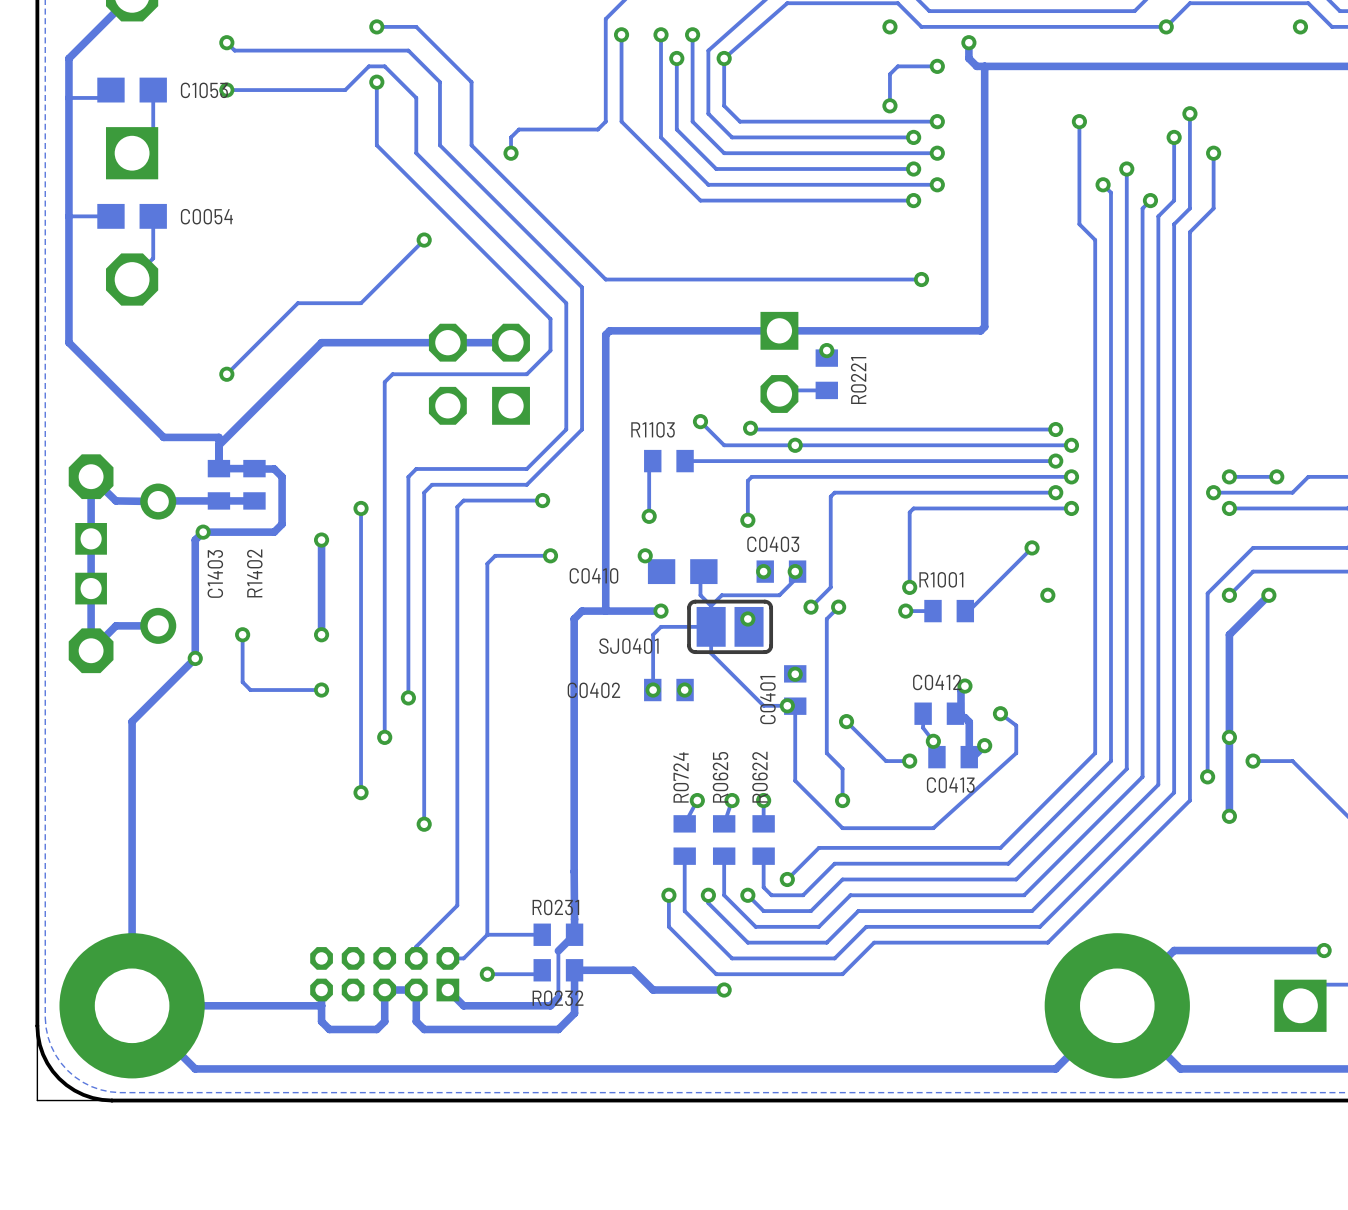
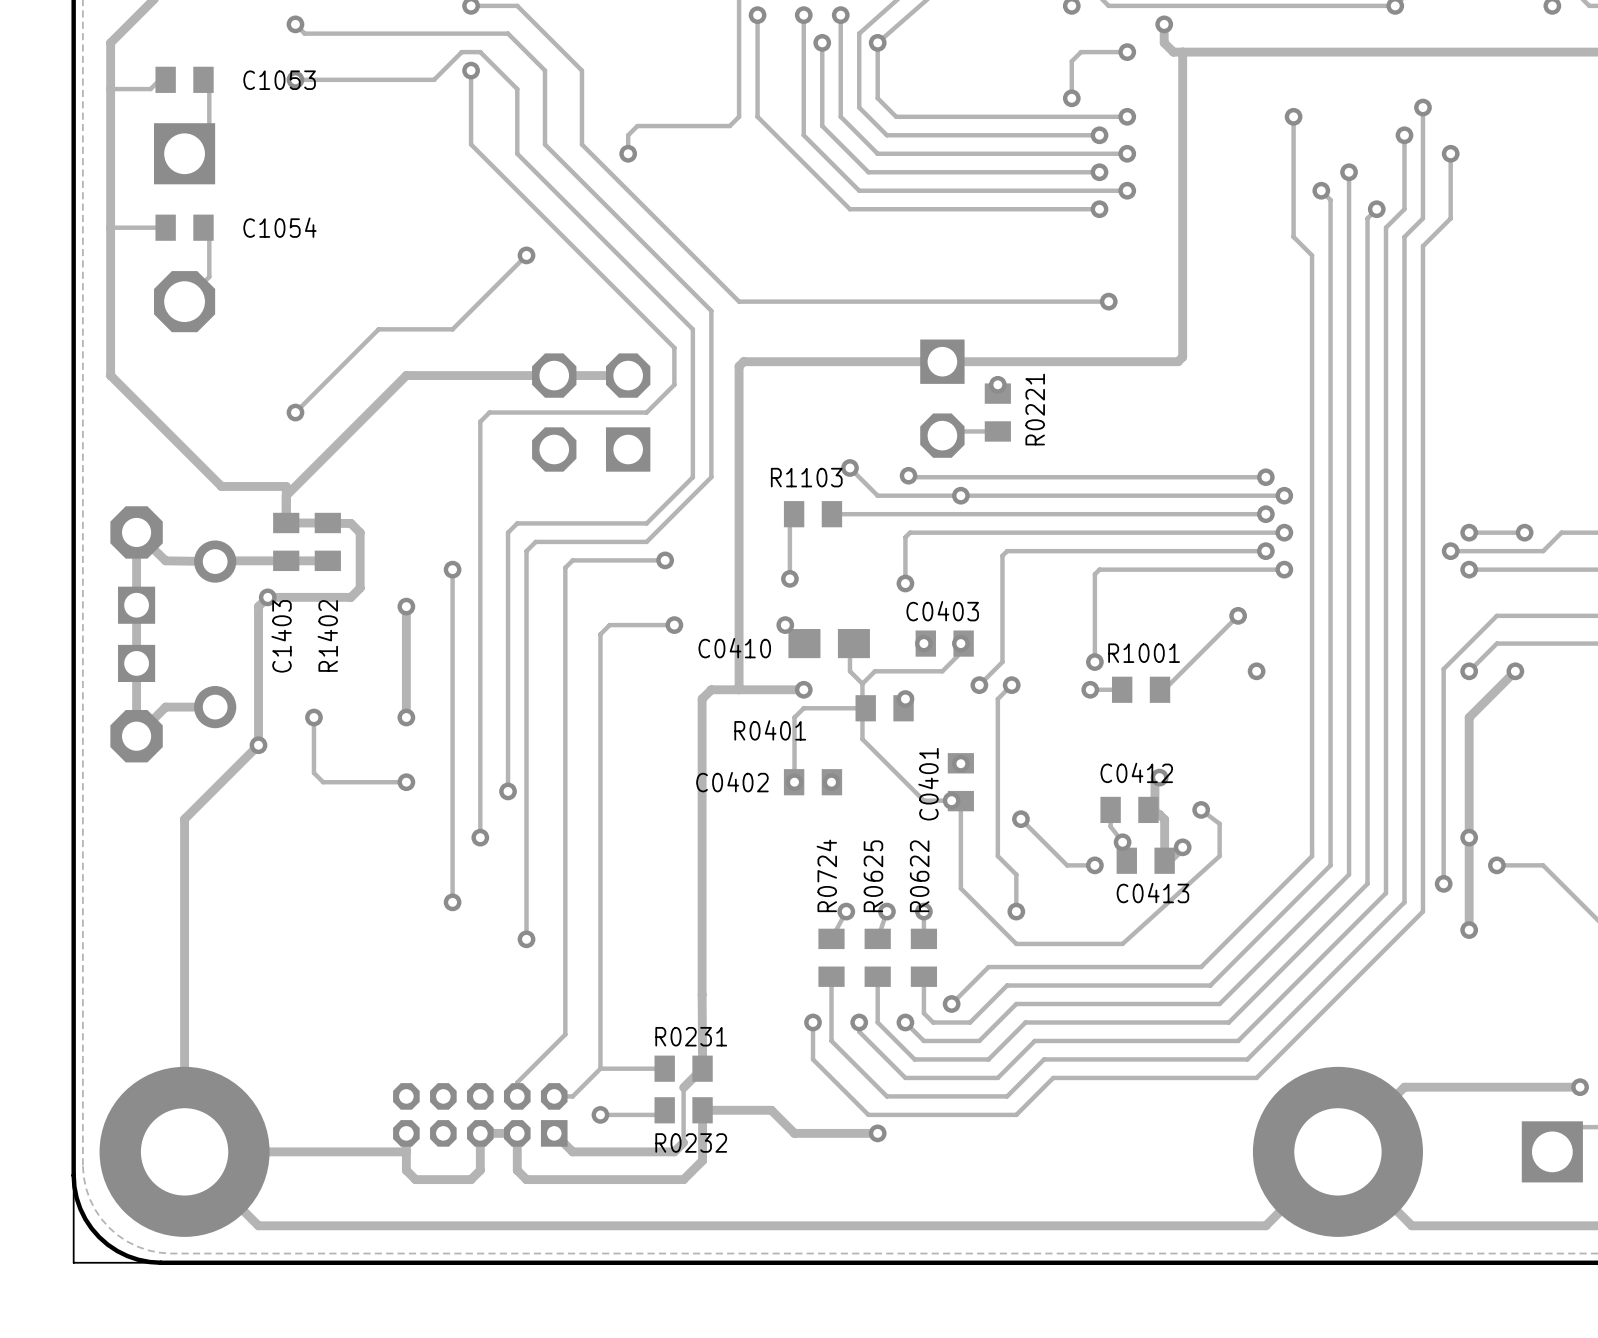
C1053 footprint: [97, 77, 167, 103] -> [155, 66, 214, 93]
C0054: (132, 216) -> none
C1054: none -> (184, 227)
SJ0401: (730, 626) -> none
R0401: none -> (884, 708)

